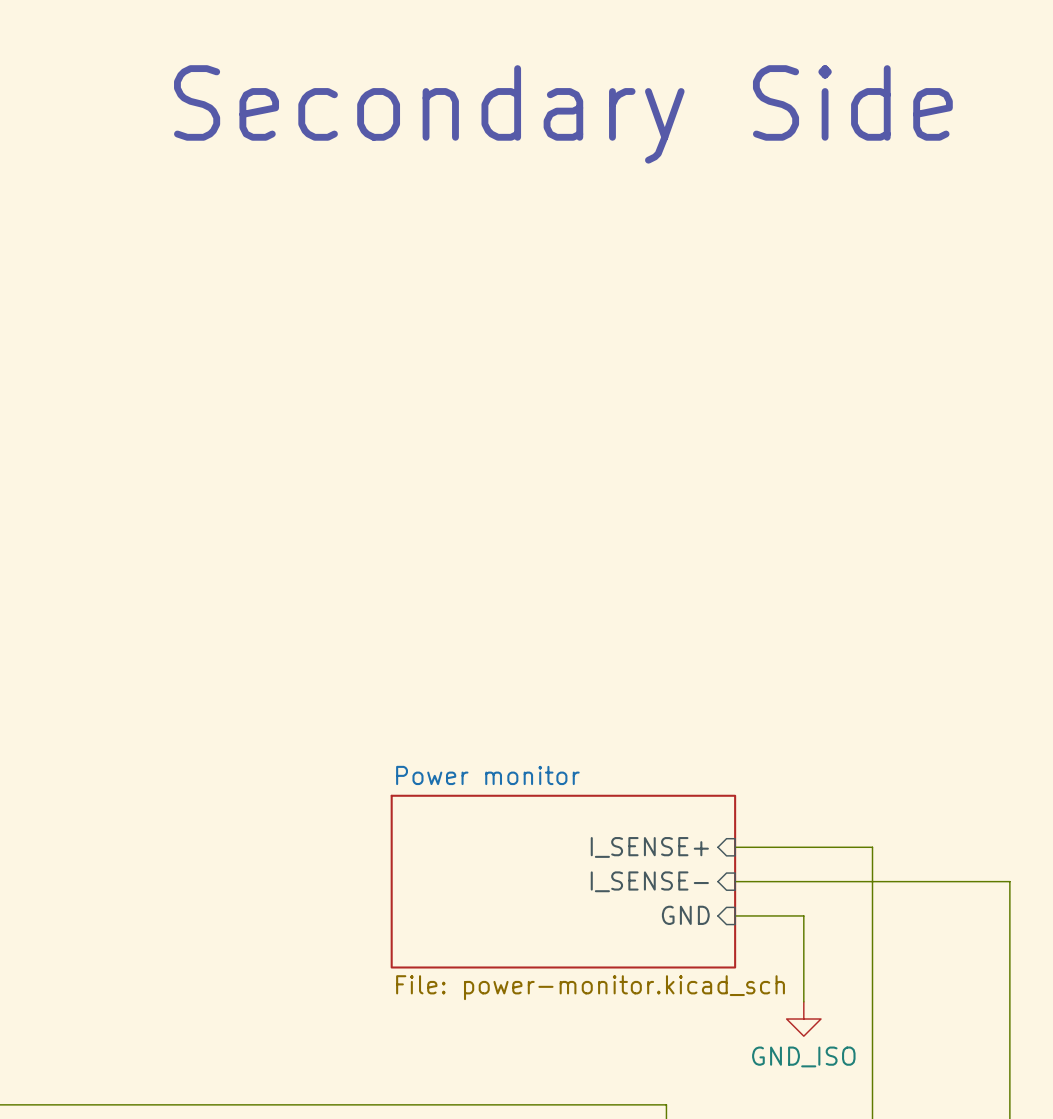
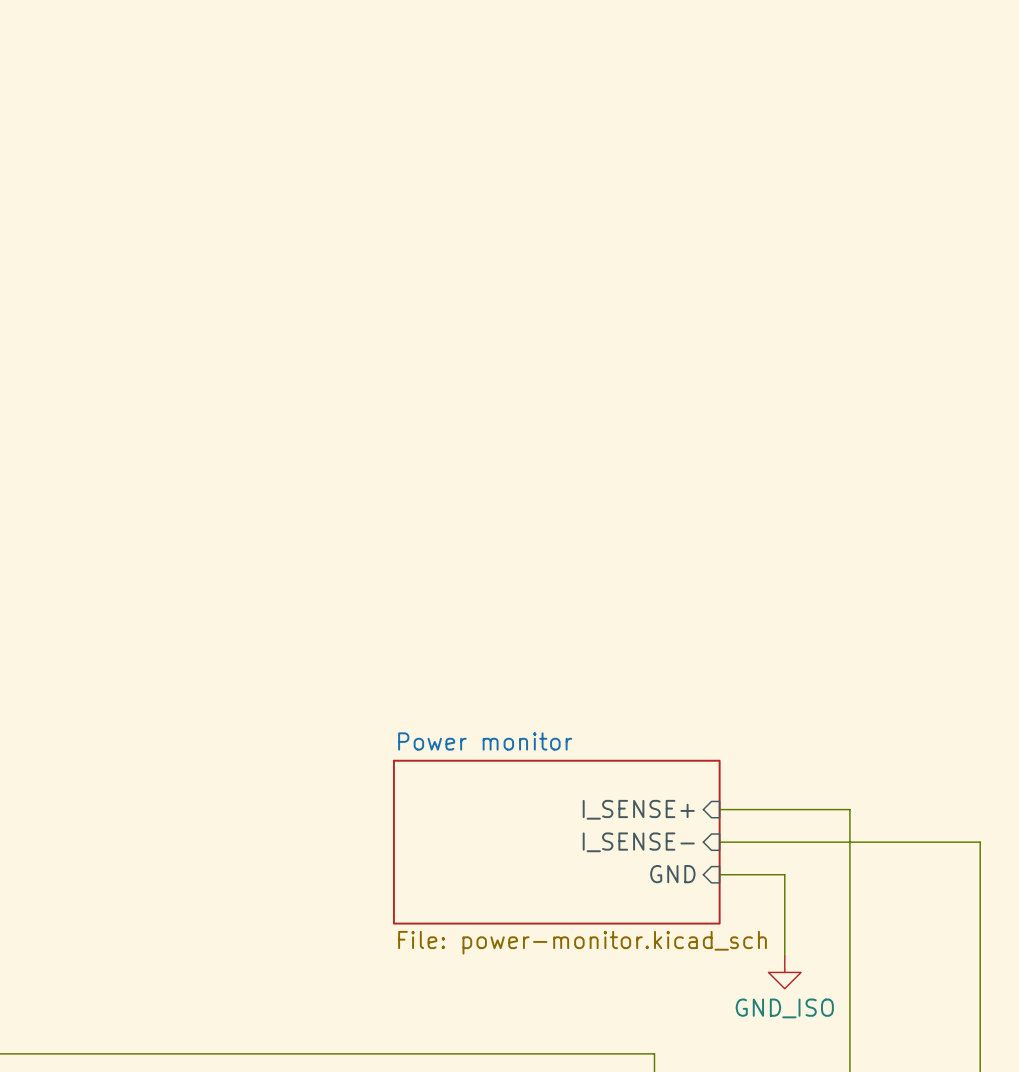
text: Secondary Side (563, 114) -> none

